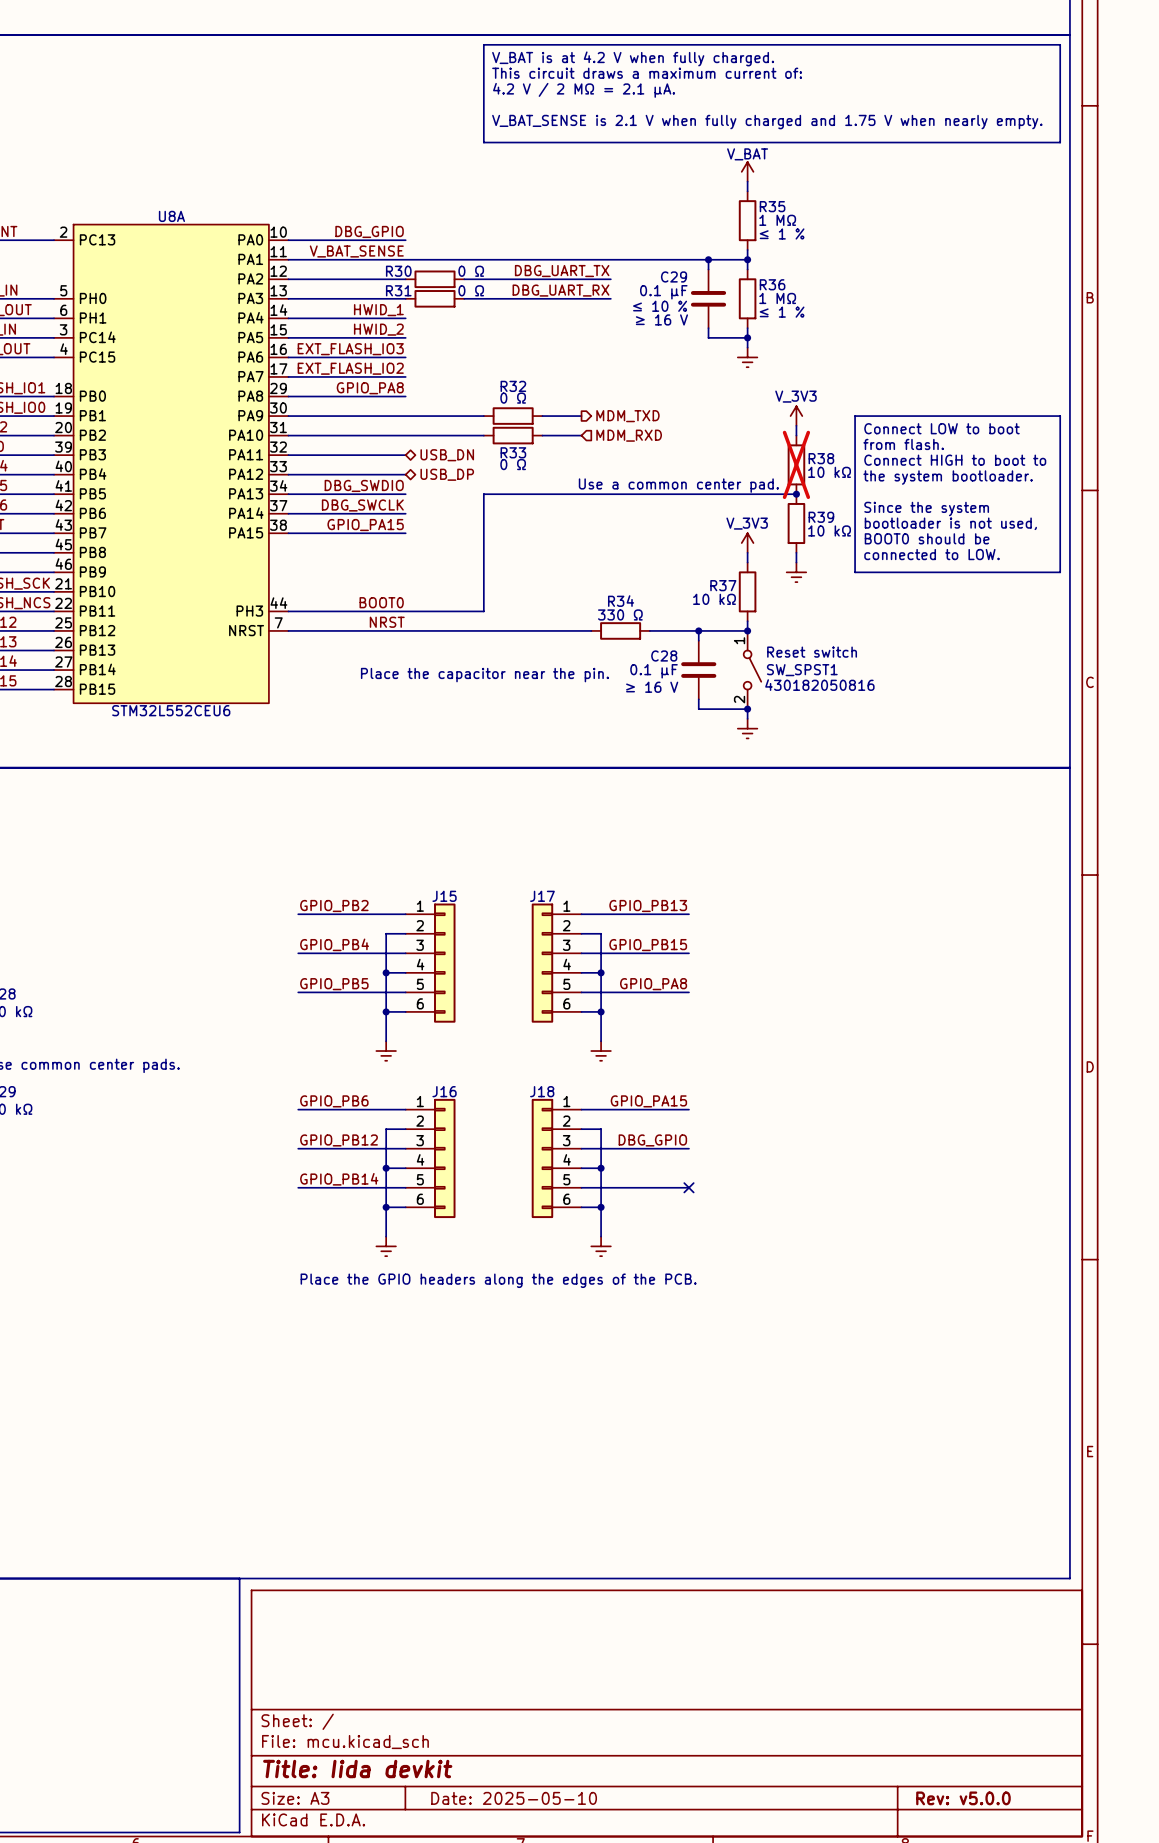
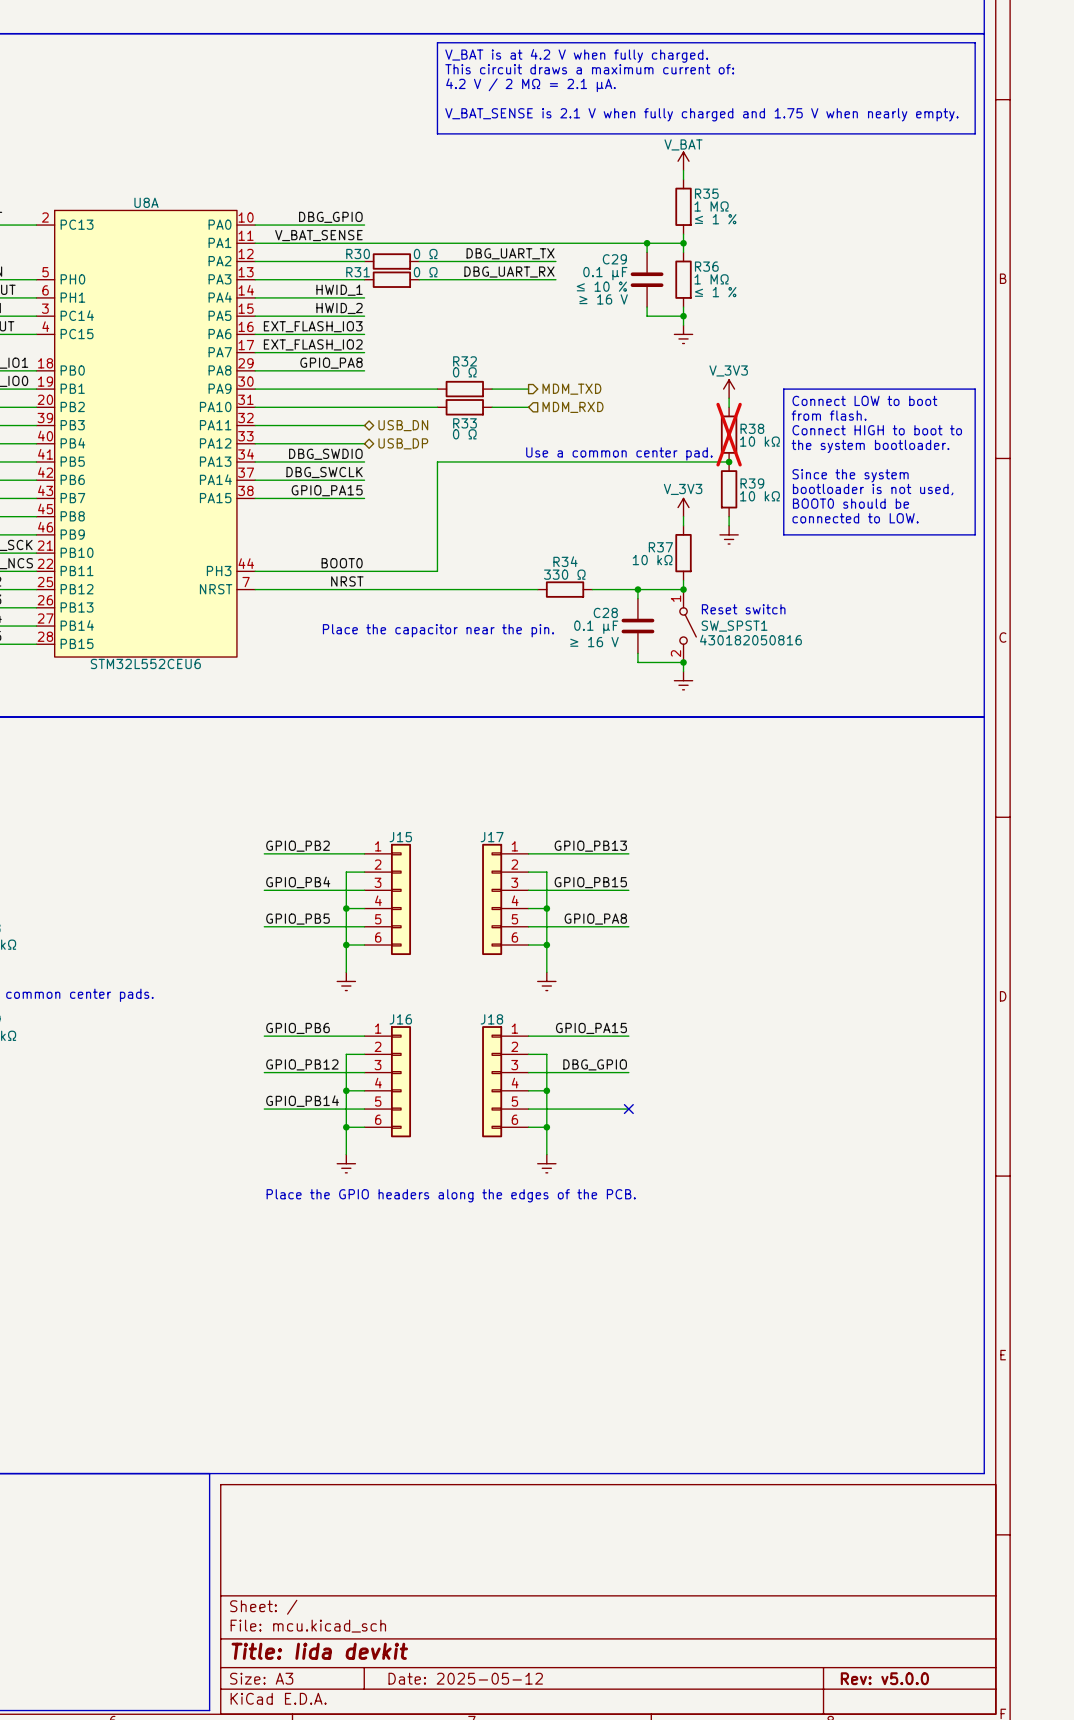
title block: Date: 2025-05-10 (514, 1798) -> Date: 2025-05-12 (465, 1678)

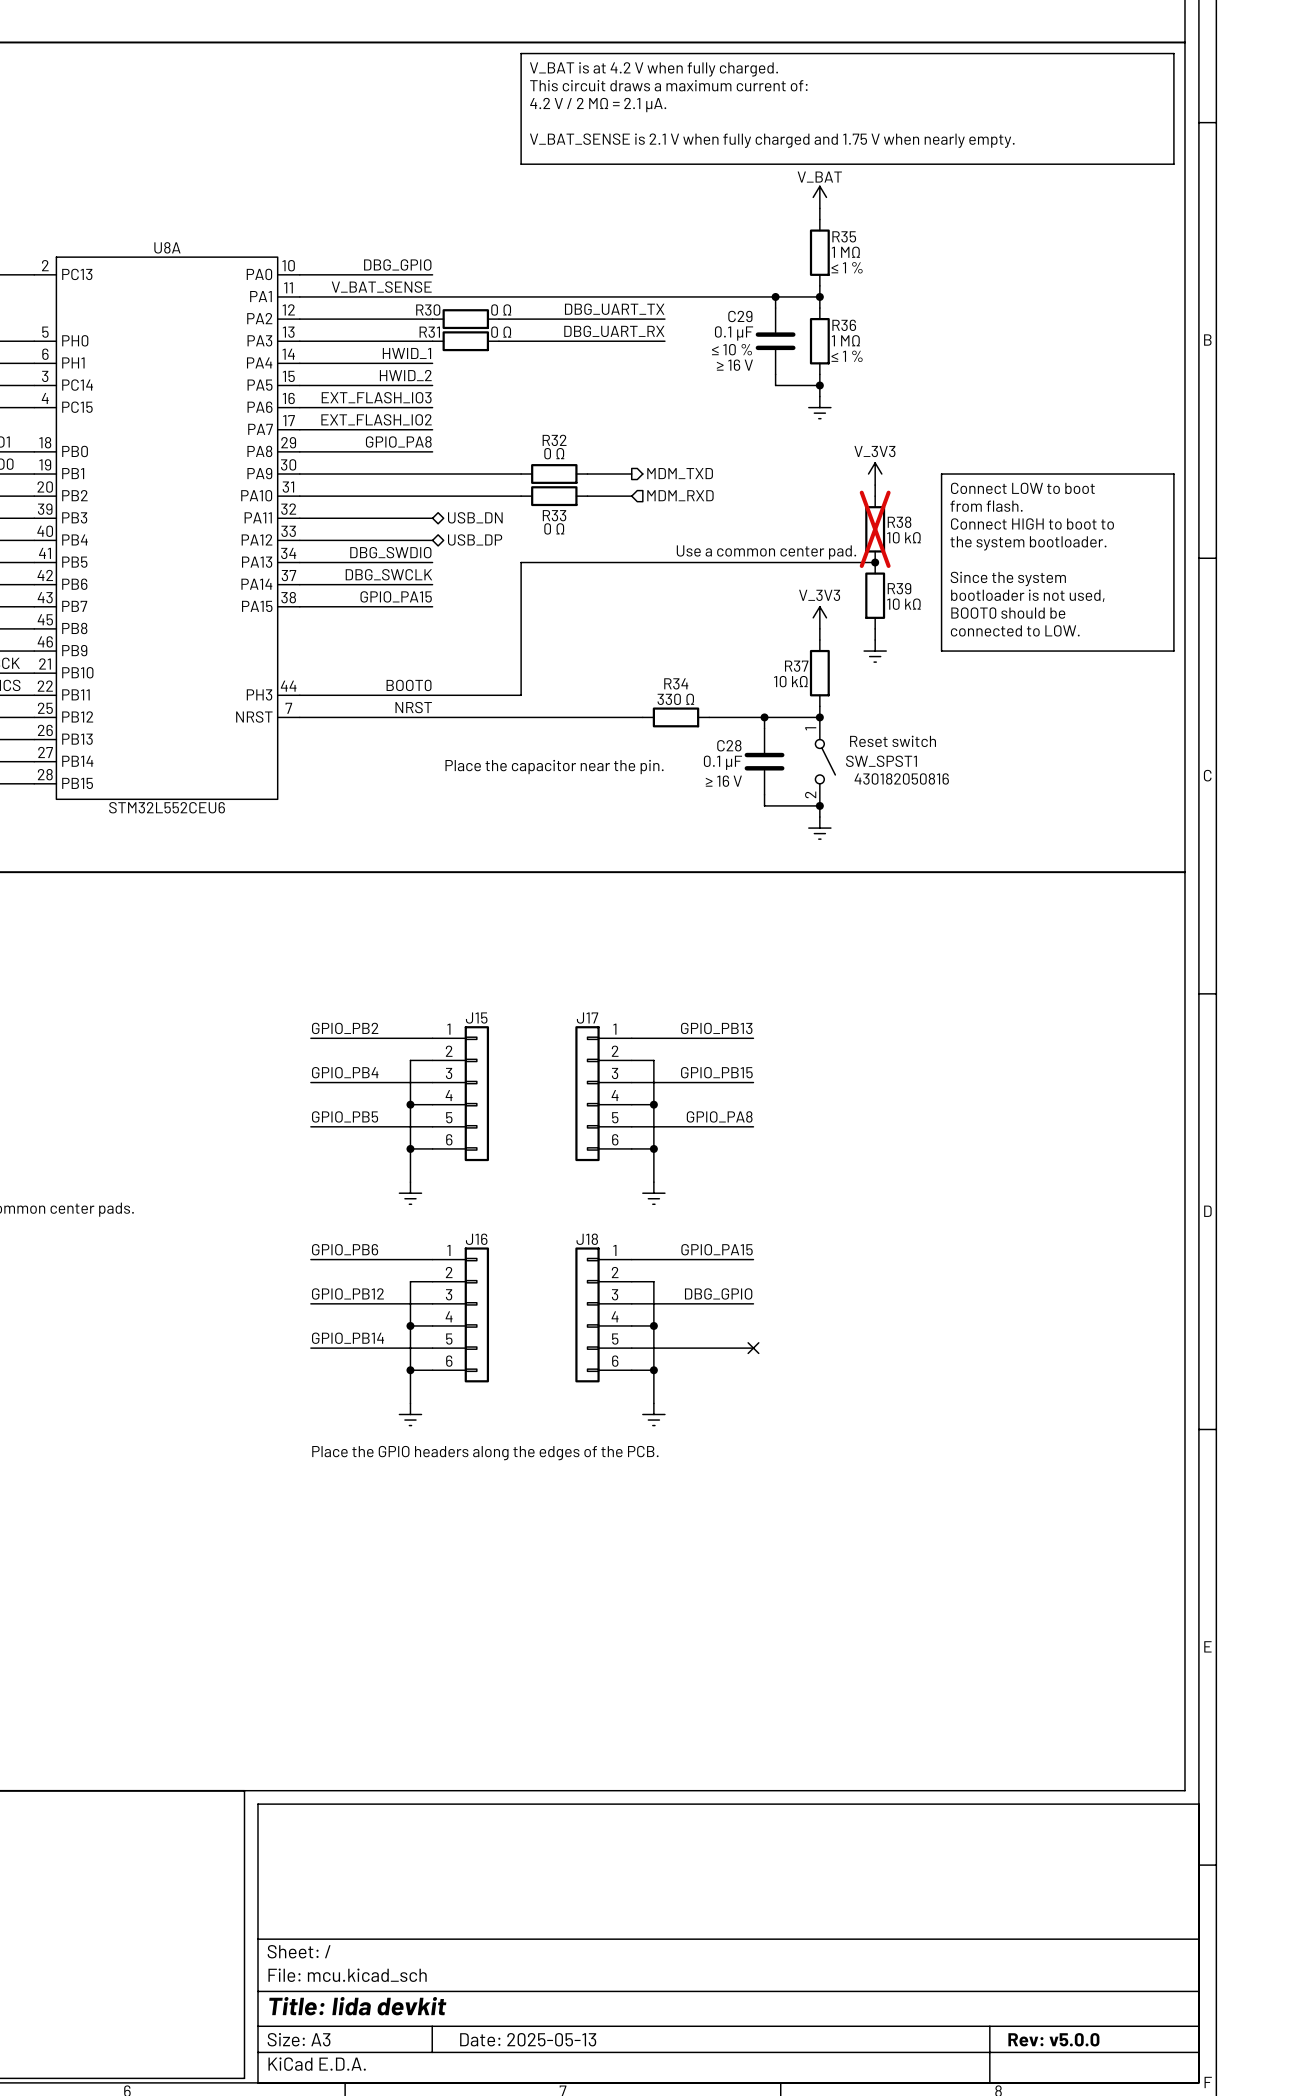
title block: Date: 2025-05-12 (465, 1678) -> Date: 2025-05-13 (528, 2039)

